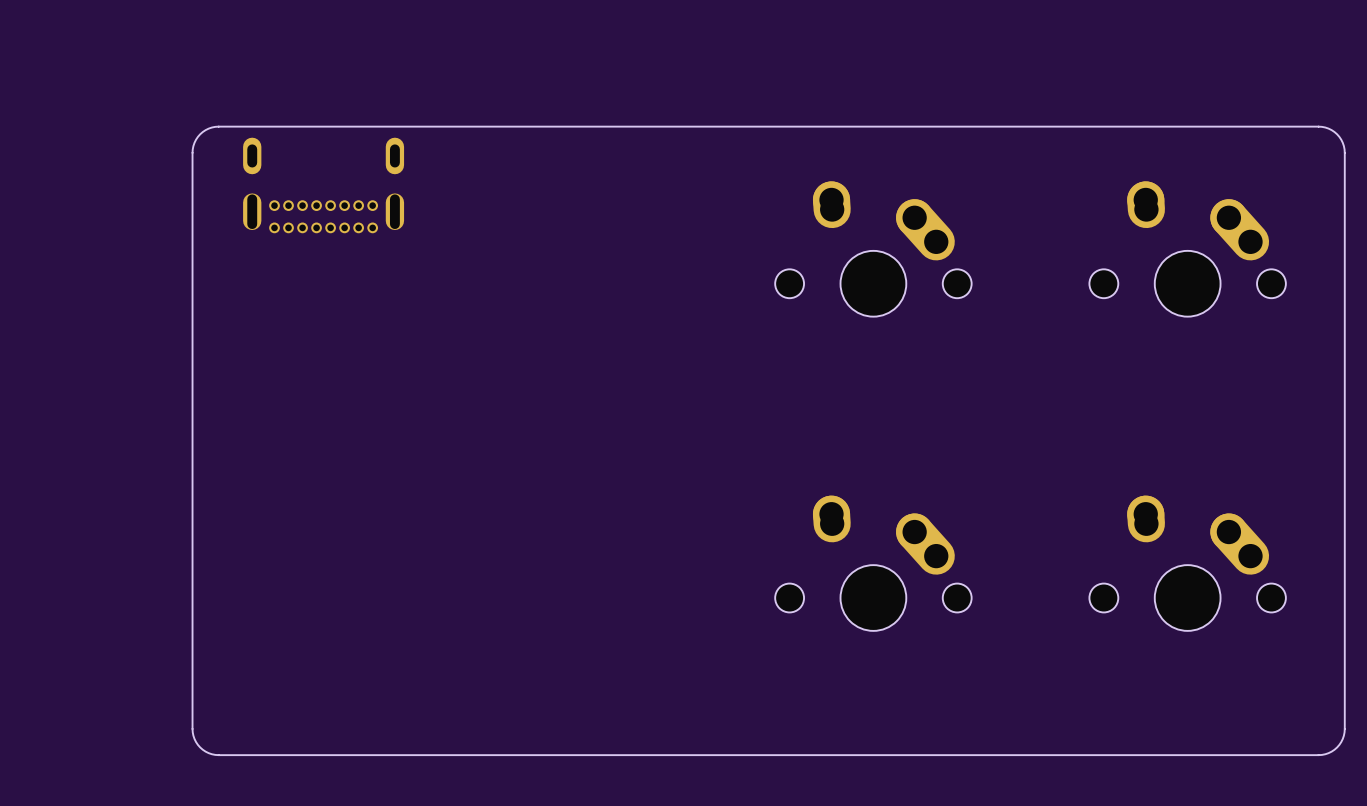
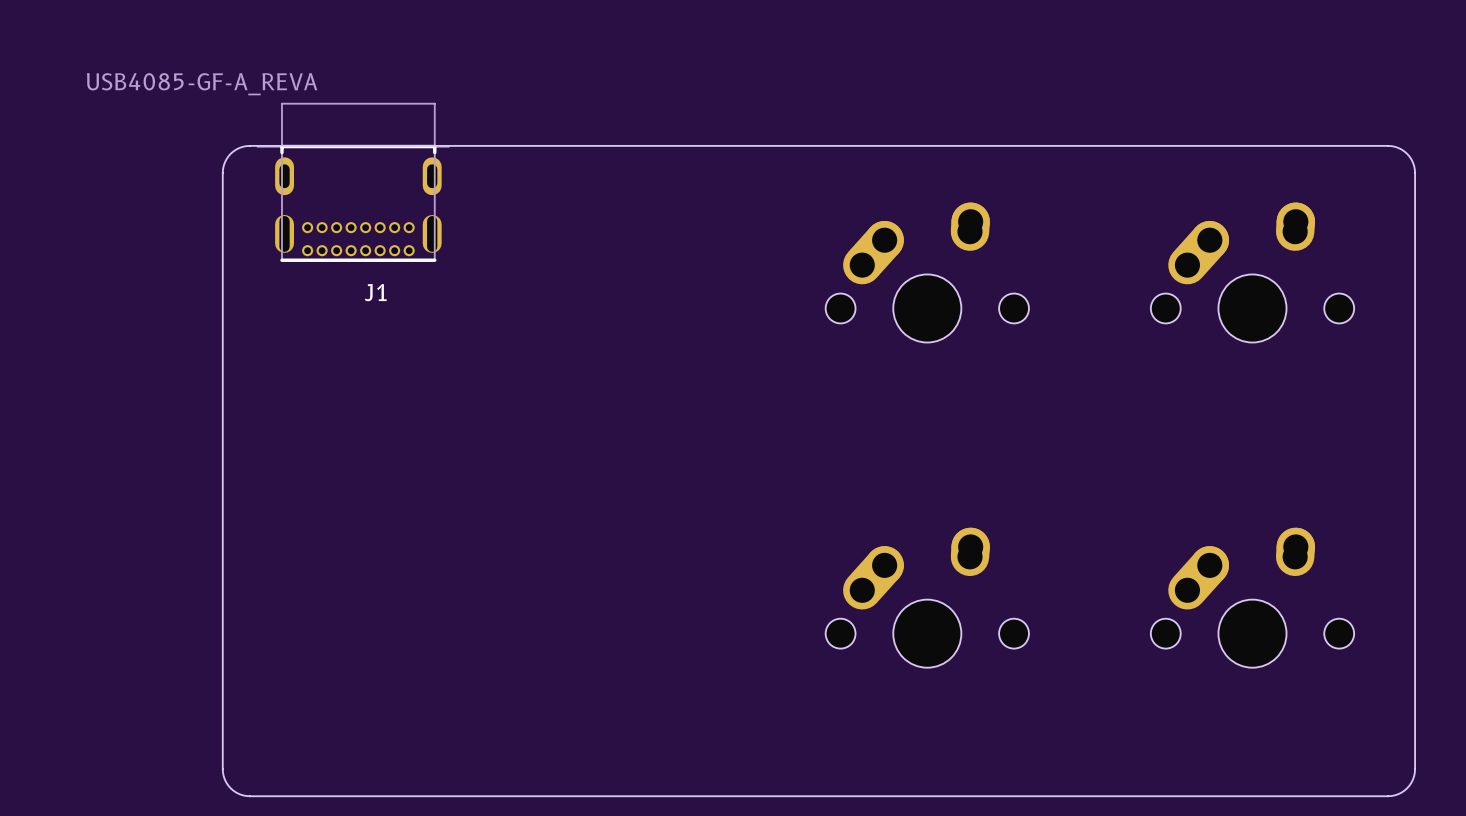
J1 side: bottom (323, 185) -> top (353, 182)
part side: bottom (873, 249) -> top (927, 272)
part side: bottom (1187, 249) -> top (1252, 272)
part side: bottom (873, 563) -> top (927, 597)
part side: bottom (1187, 563) -> top (1252, 597)

